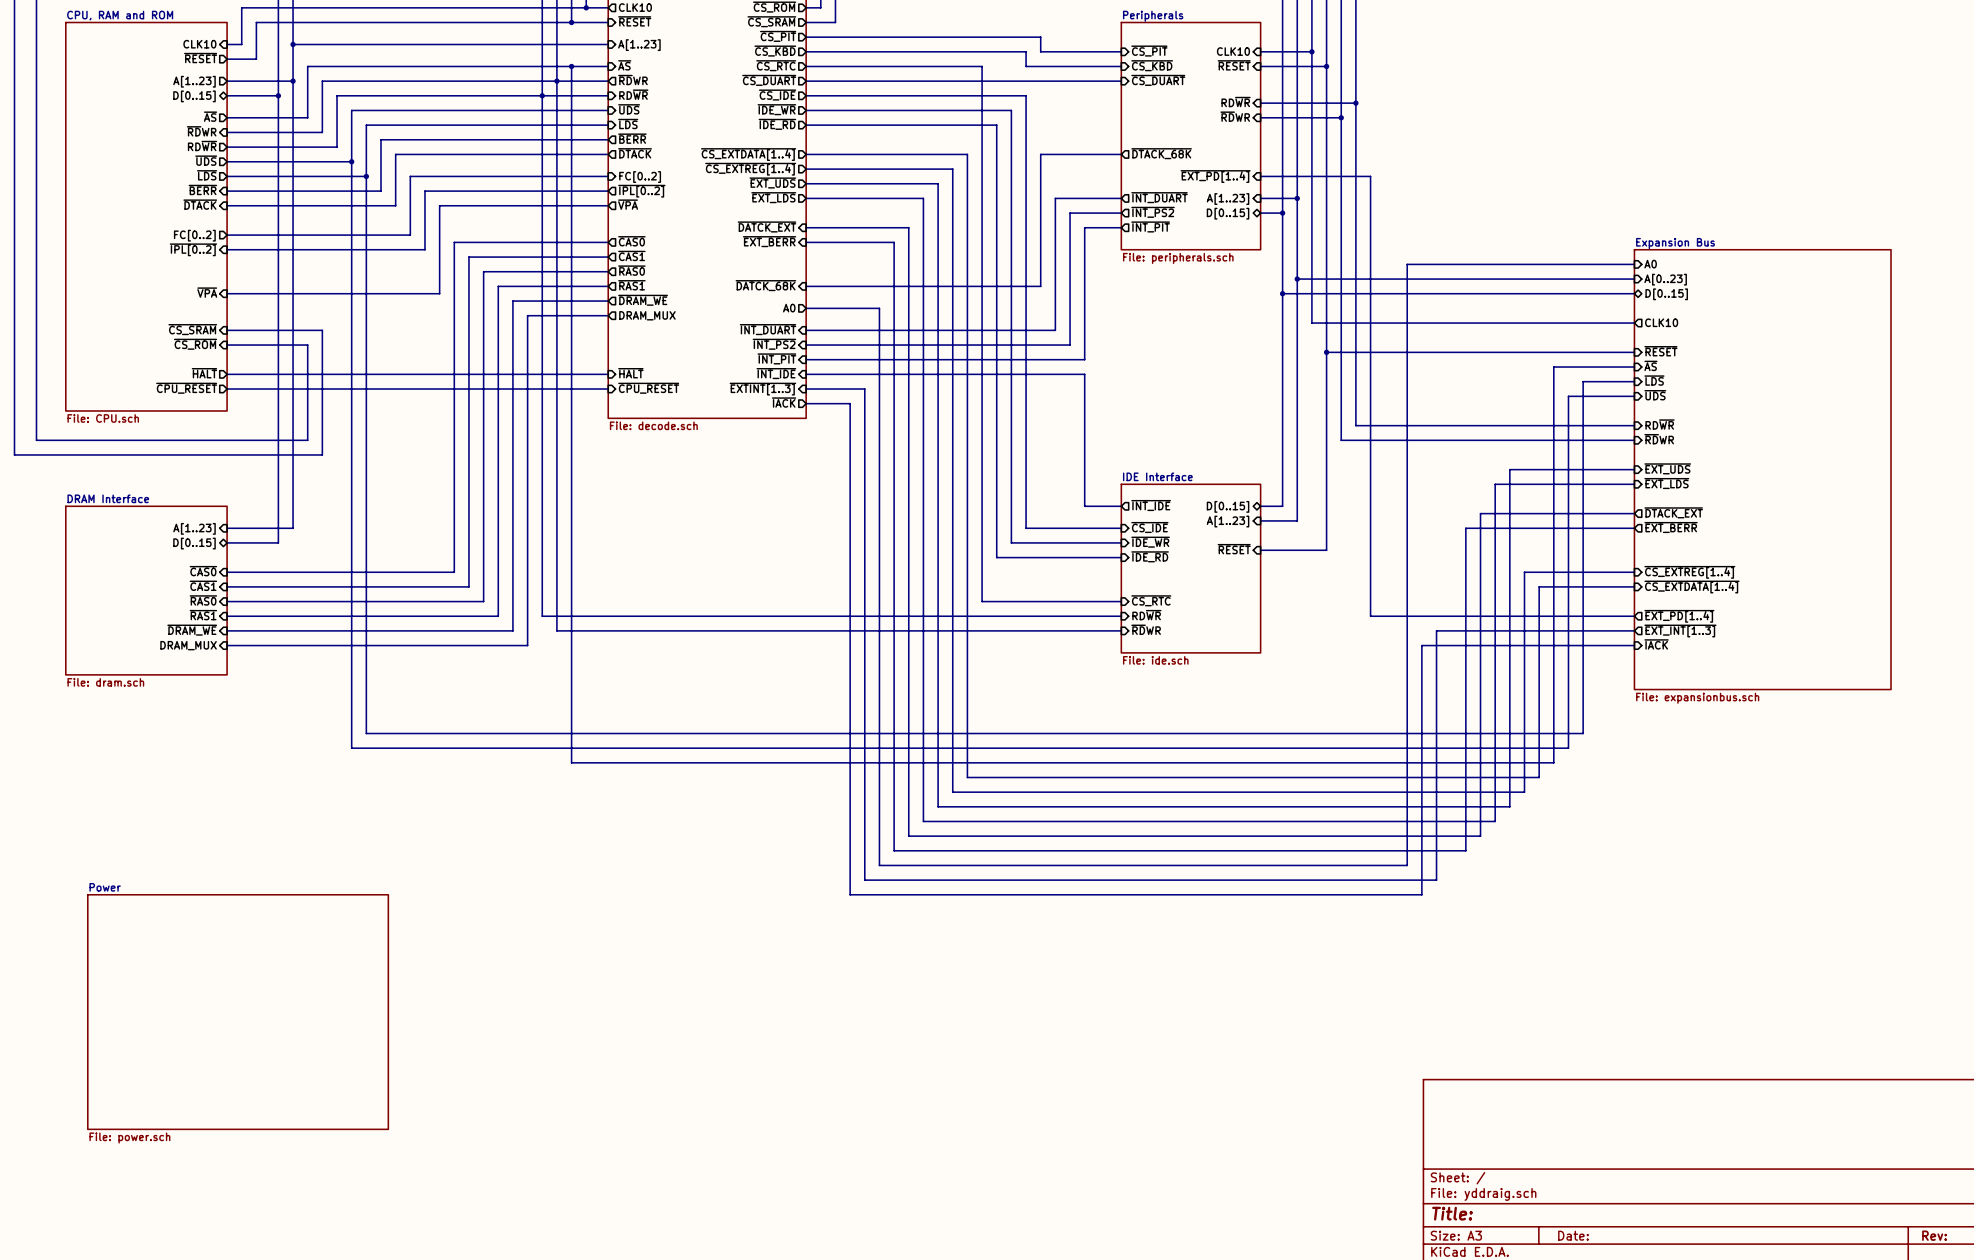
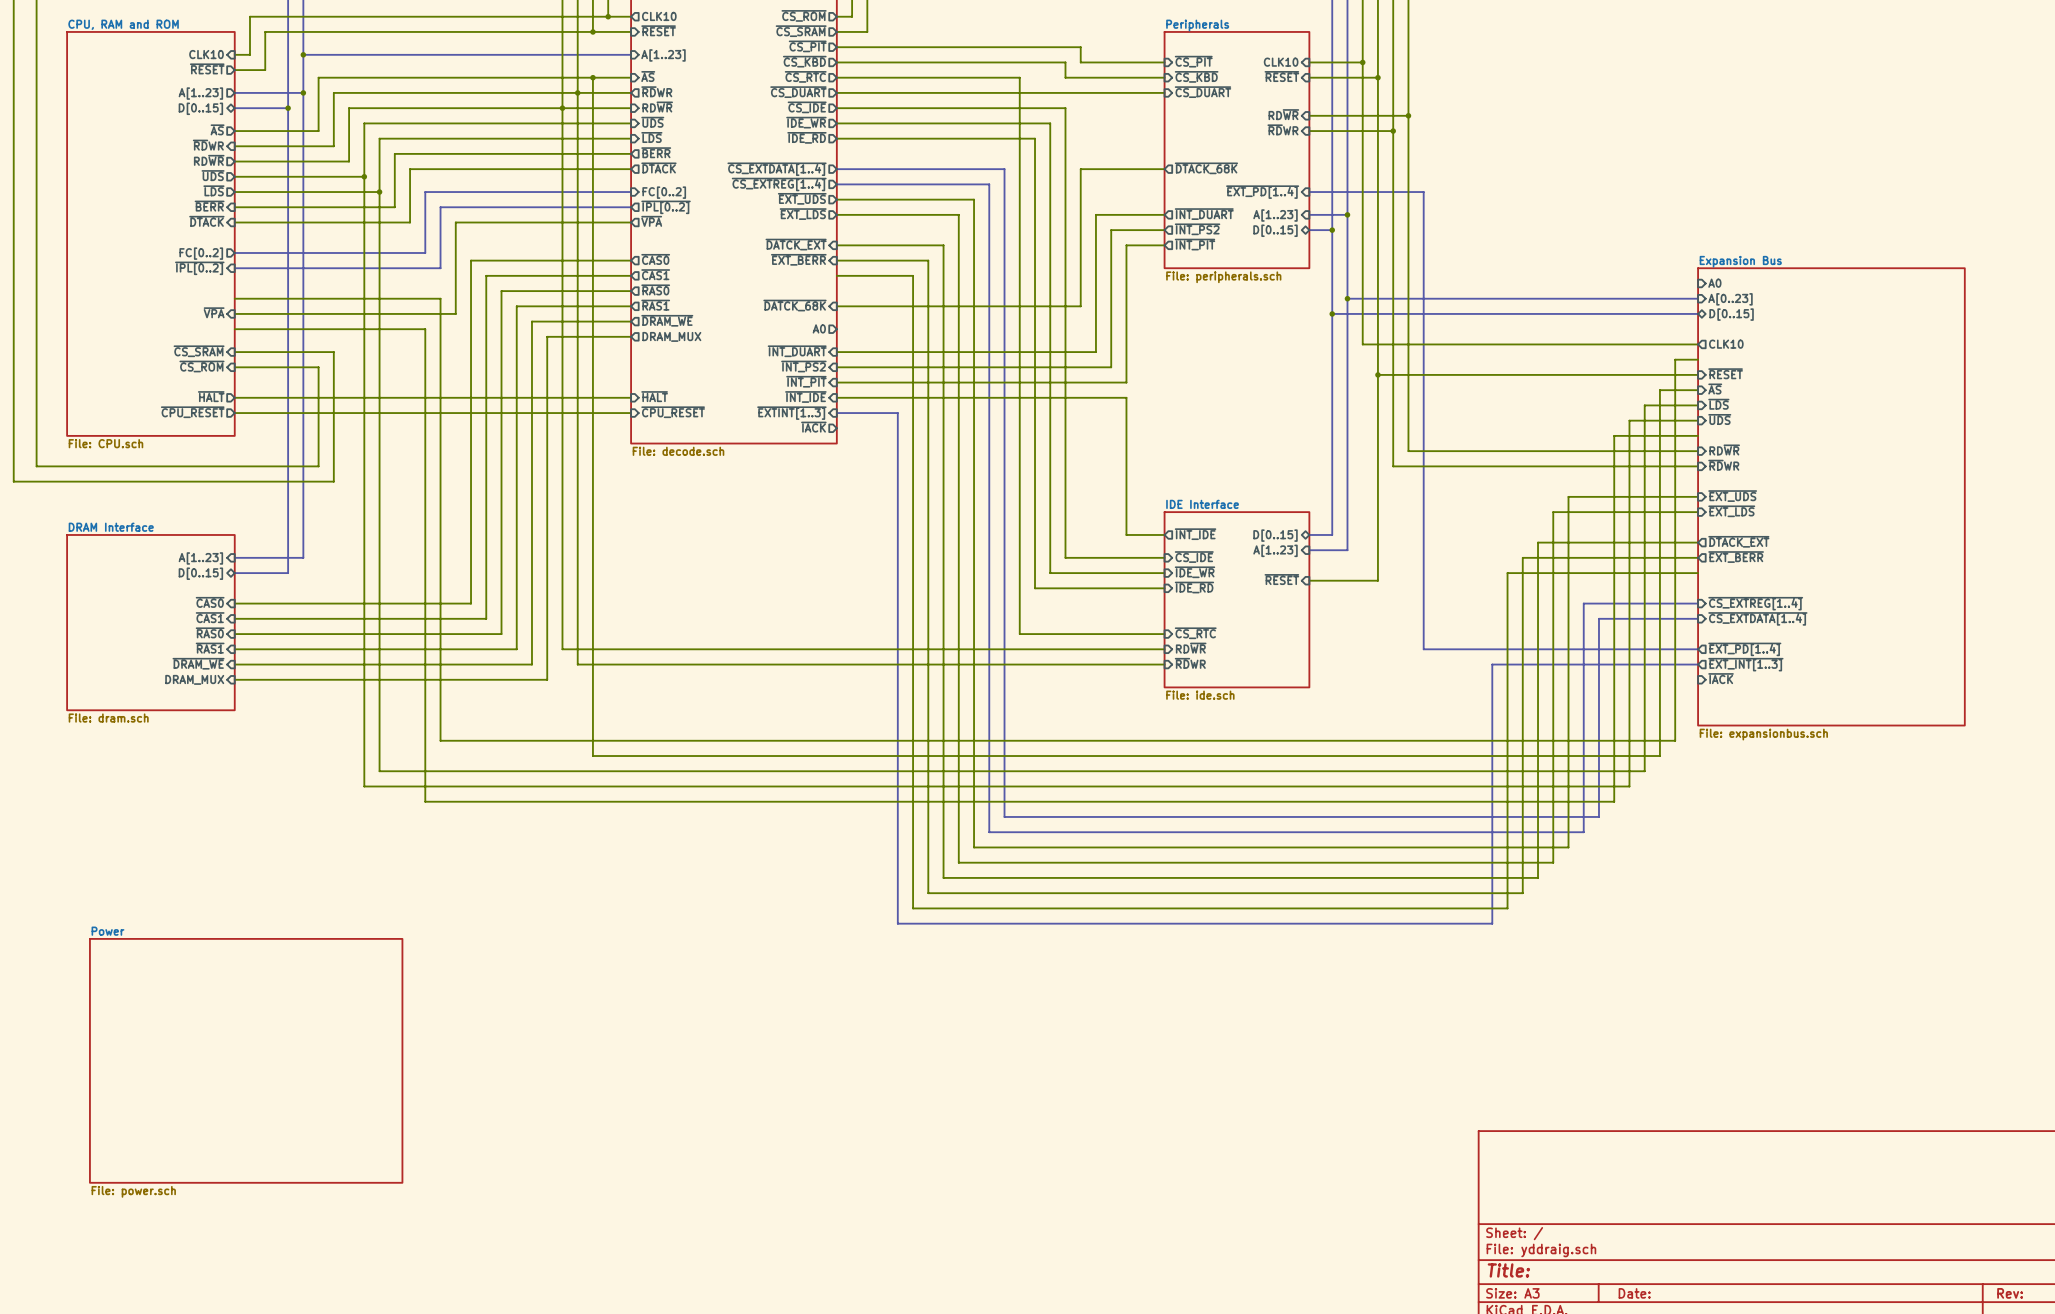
wire: (1634, 264) (1407, 264) (1407, 865) -> (1698, 573) (1507, 573) (1507, 908) (1461, 908)
wire: none -> (234, 298) (440, 298) (440, 740) (1675, 740) (1675, 359) (1698, 359)
wire: (806, 308) (879, 308) -> (836, 275) (913, 275) (913, 329)
wire: (1597, 367) (1553, 367) (1553, 410) -> (1698, 435) (1614, 435)
wire: none -> (1659, 390) (1659, 756) (592, 756)
wire: (806, 403) (850, 403) (850, 894) (1421, 894) (1421, 645) (1634, 645) -> none
wire: (571, 718) (571, 762) -> (234, 329) (425, 329) (425, 801) (592, 801)

